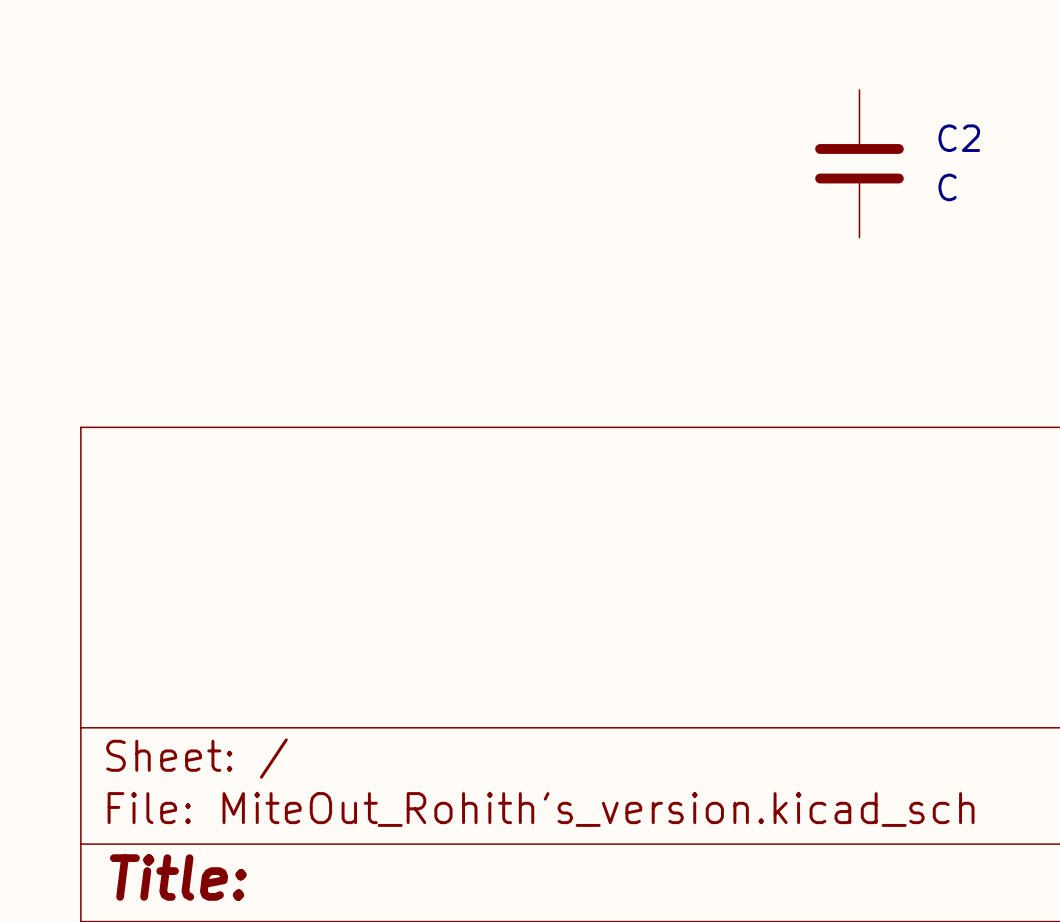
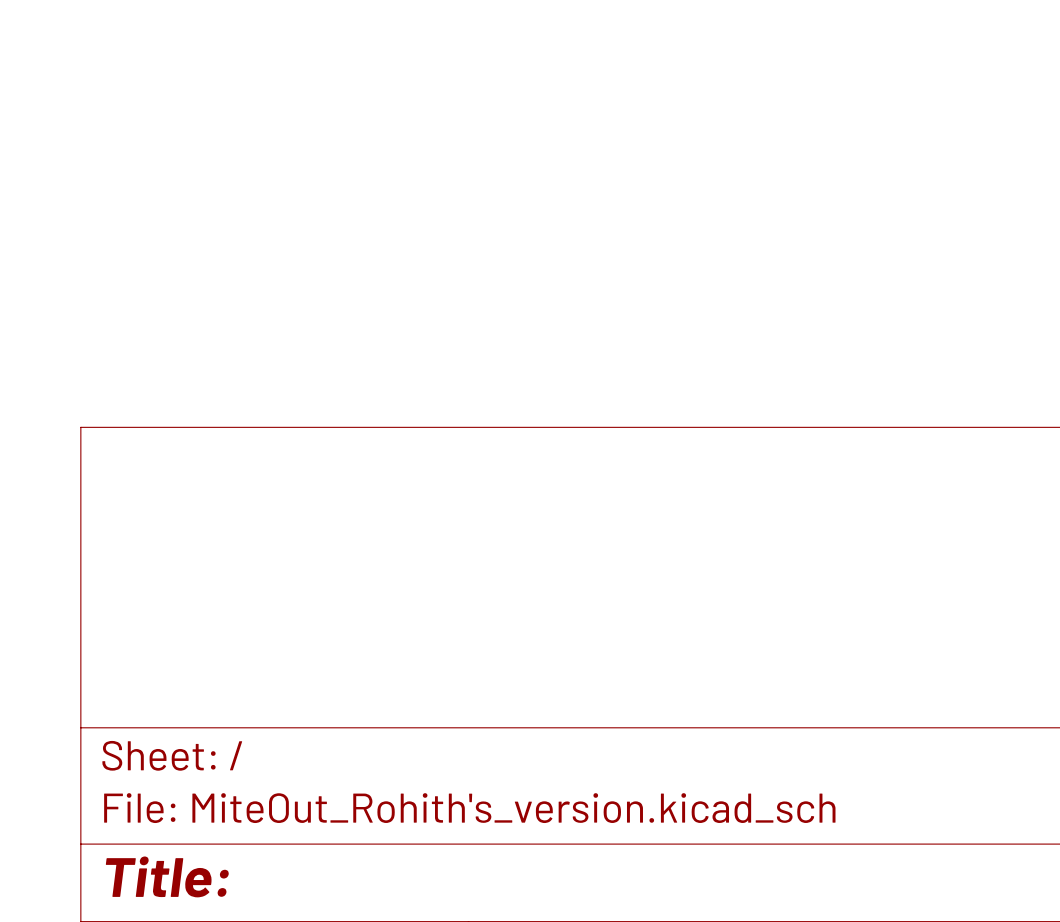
C2: C (859, 163) -> none

